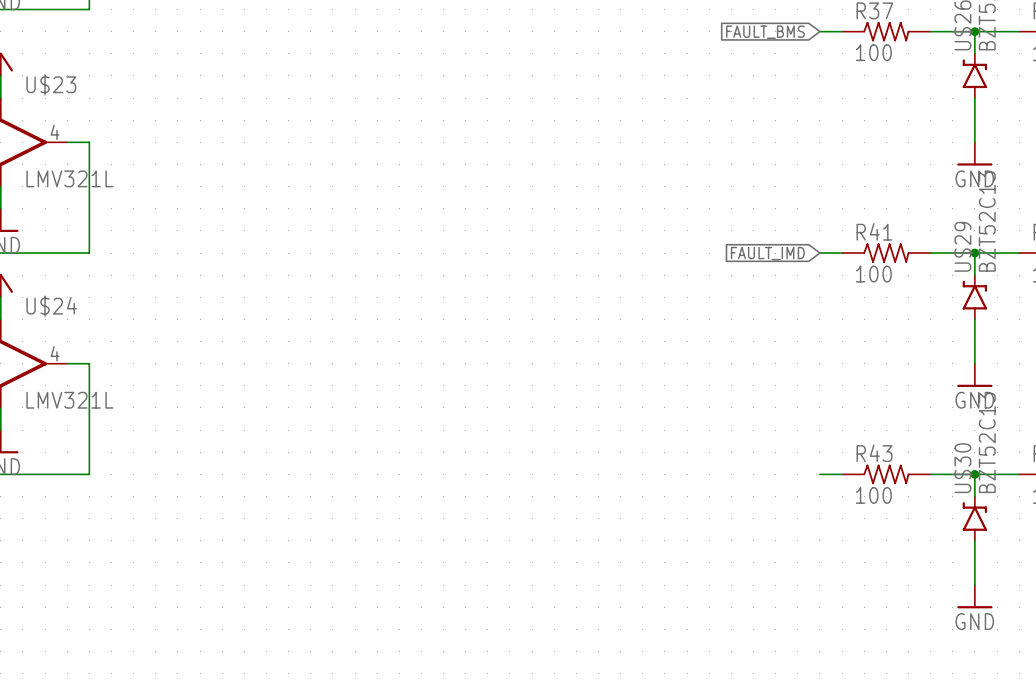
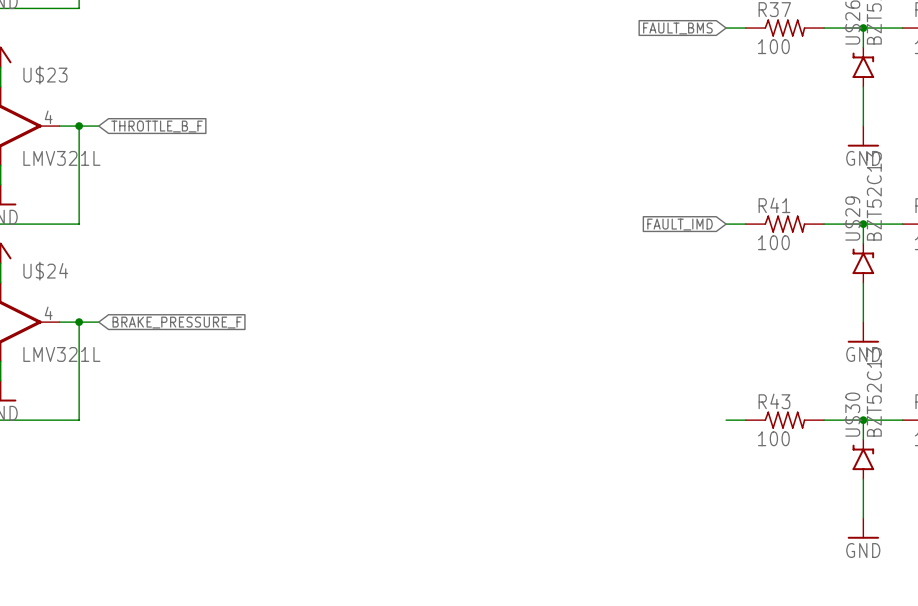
wire: none -> (79, 126) (98, 126)
junction: none -> (79, 126)
global label: none -> THROTTLE_B_F (157, 126)
wire: none -> (79, 322) (98, 322)
junction: none -> (79, 322)
global label: none -> BRAKE_PRESSURE_F (177, 322)

